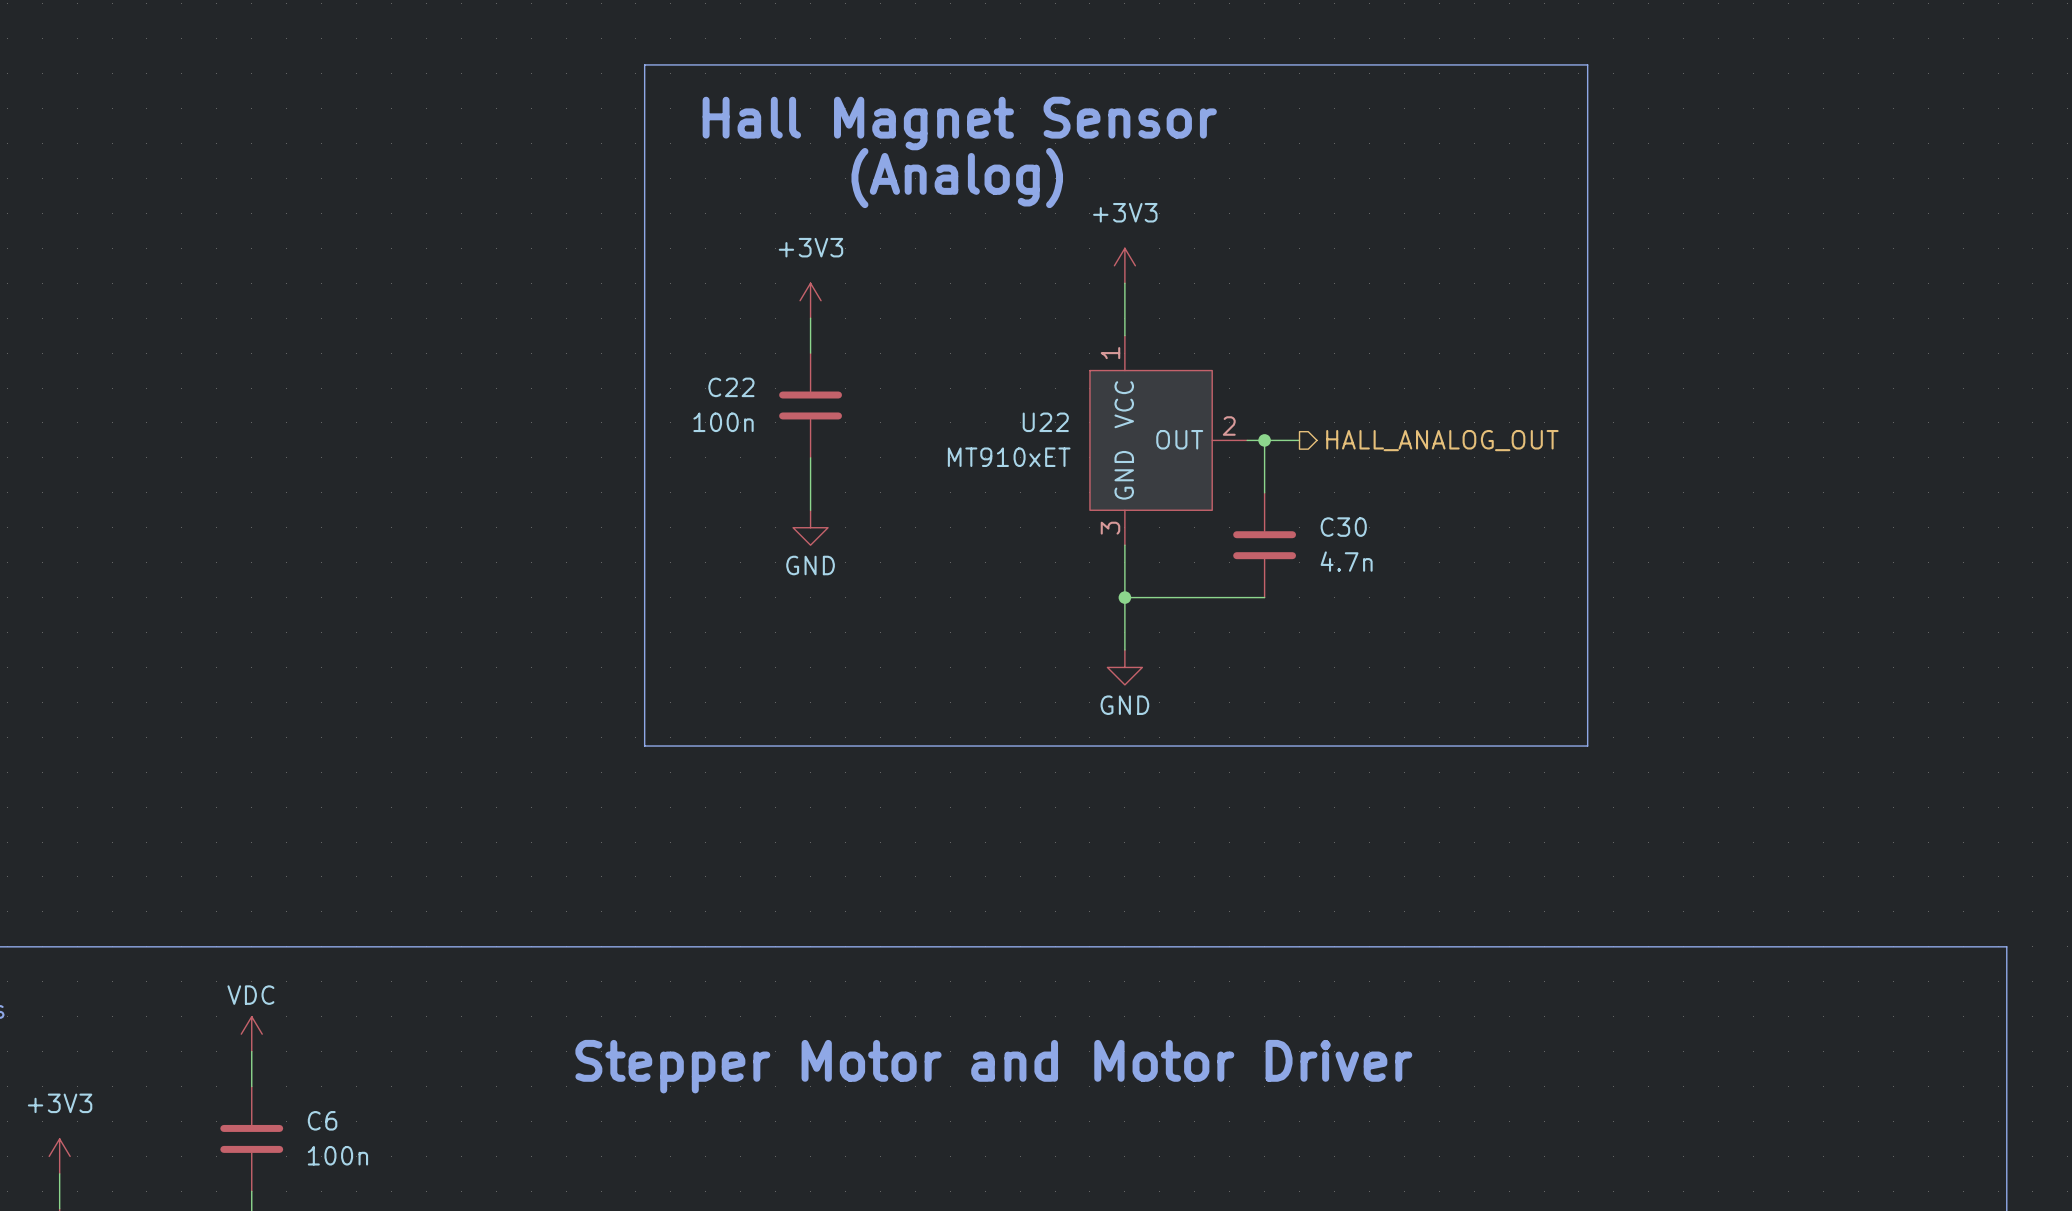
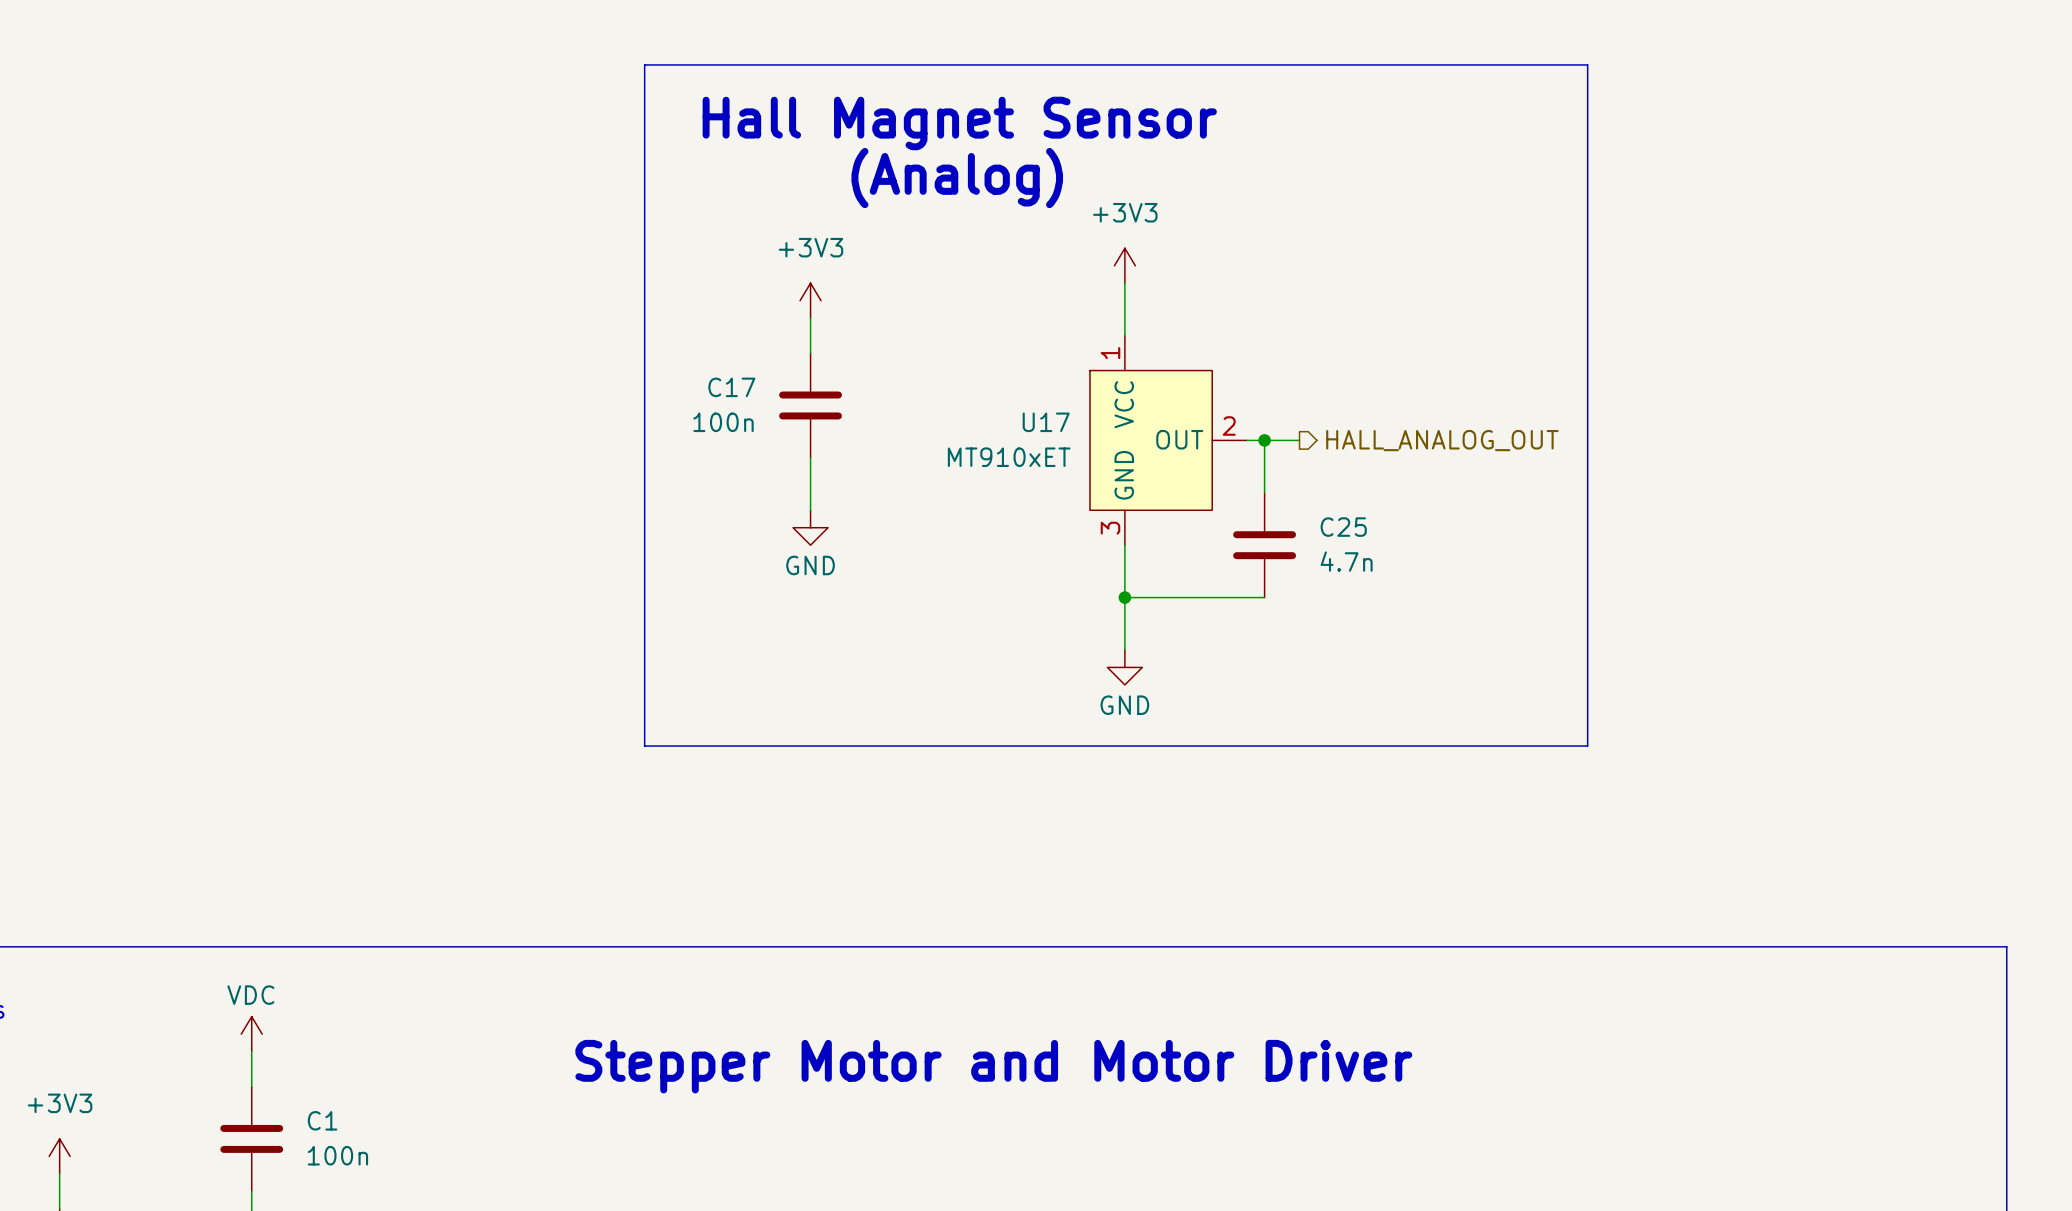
C22 name: C22 (731, 387) -> C17 (731, 387)
U22 name: U22 (1045, 422) -> U17 (1046, 422)
C30 name: C30 (1343, 527) -> C25 (1343, 527)
C6 name: C6 (322, 1120) -> C1 (322, 1120)

